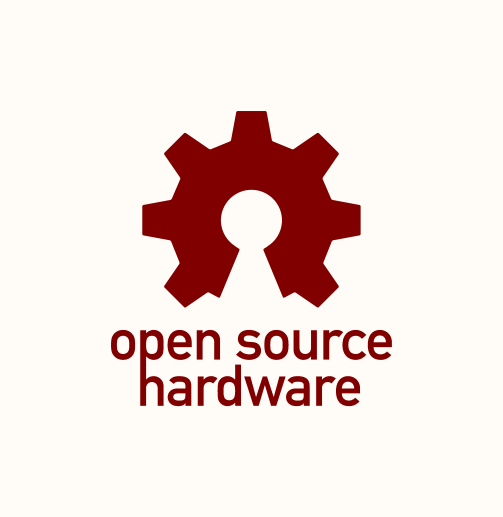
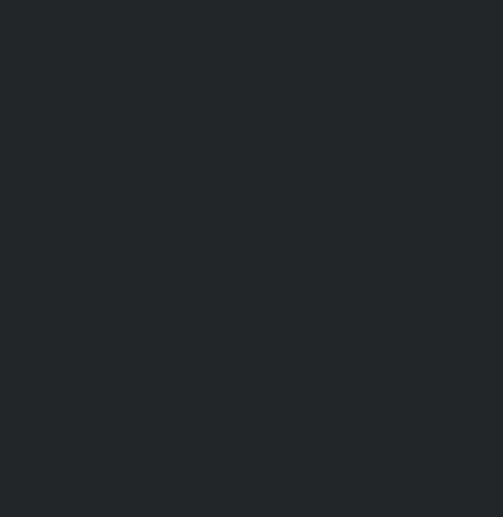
part: (251, 258) -> none

